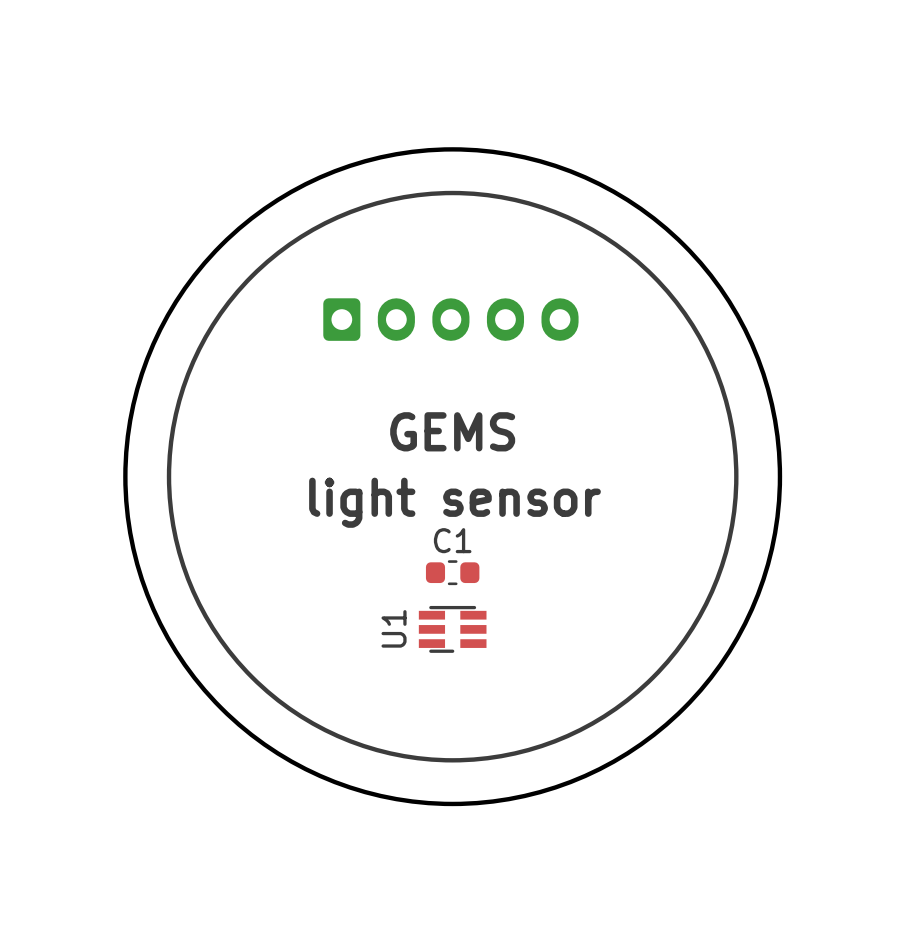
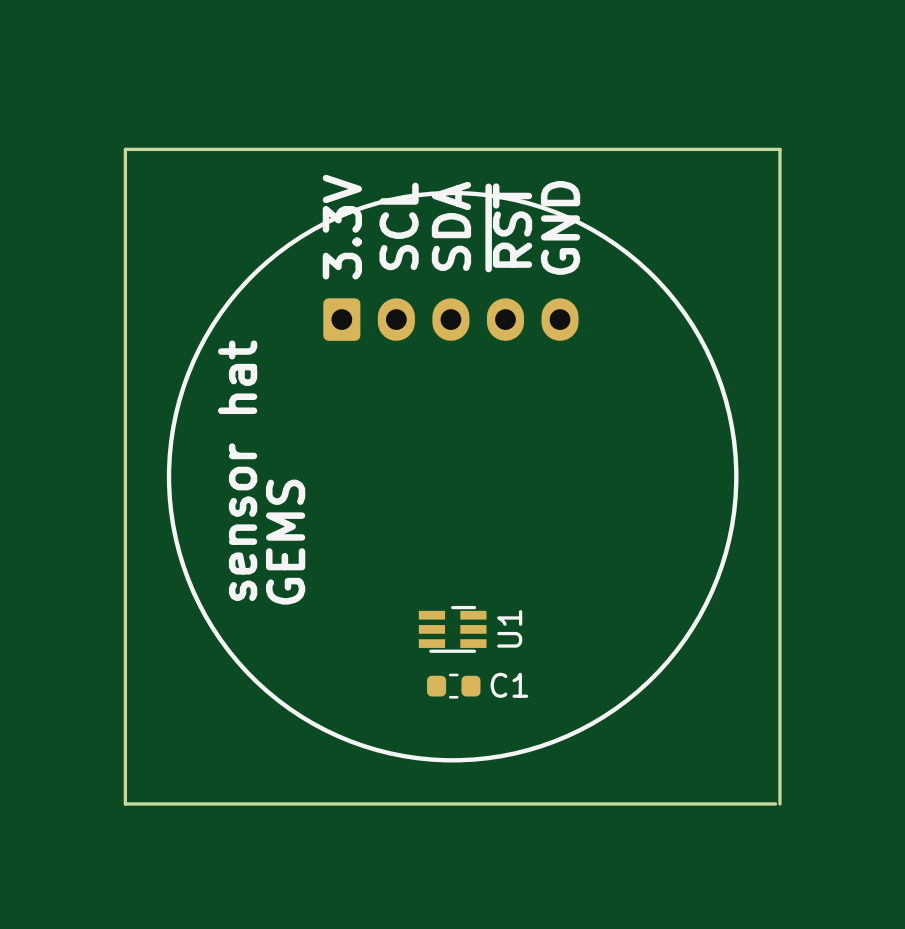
round board edge: [123, 147, 783, 807] -> none
text: none -> SCL (399, 226)
text: none -> SDA (451, 226)
text: none -> 3.3V (342, 227)
text: none -> ~{RST} (508, 227)
text: none -> GND (560, 227)
text rotation: 0° (452, 431) -> 90° counterclockwise (285, 542)
text position: GEMS (452, 431) -> GEMS (285, 542)
text: none -> sensor hat (237, 470)
text: light sensor (455, 502) -> none
C1 name position: C1 (452, 540) -> C1 (509, 685)
C1 position: (452, 572) -> (453, 686)
U1 rotation: 0° (452, 629) -> 180° (452, 629)
board edge: none -> (775, 803) (125, 803) (125, 149) (779, 149) (779, 803)

